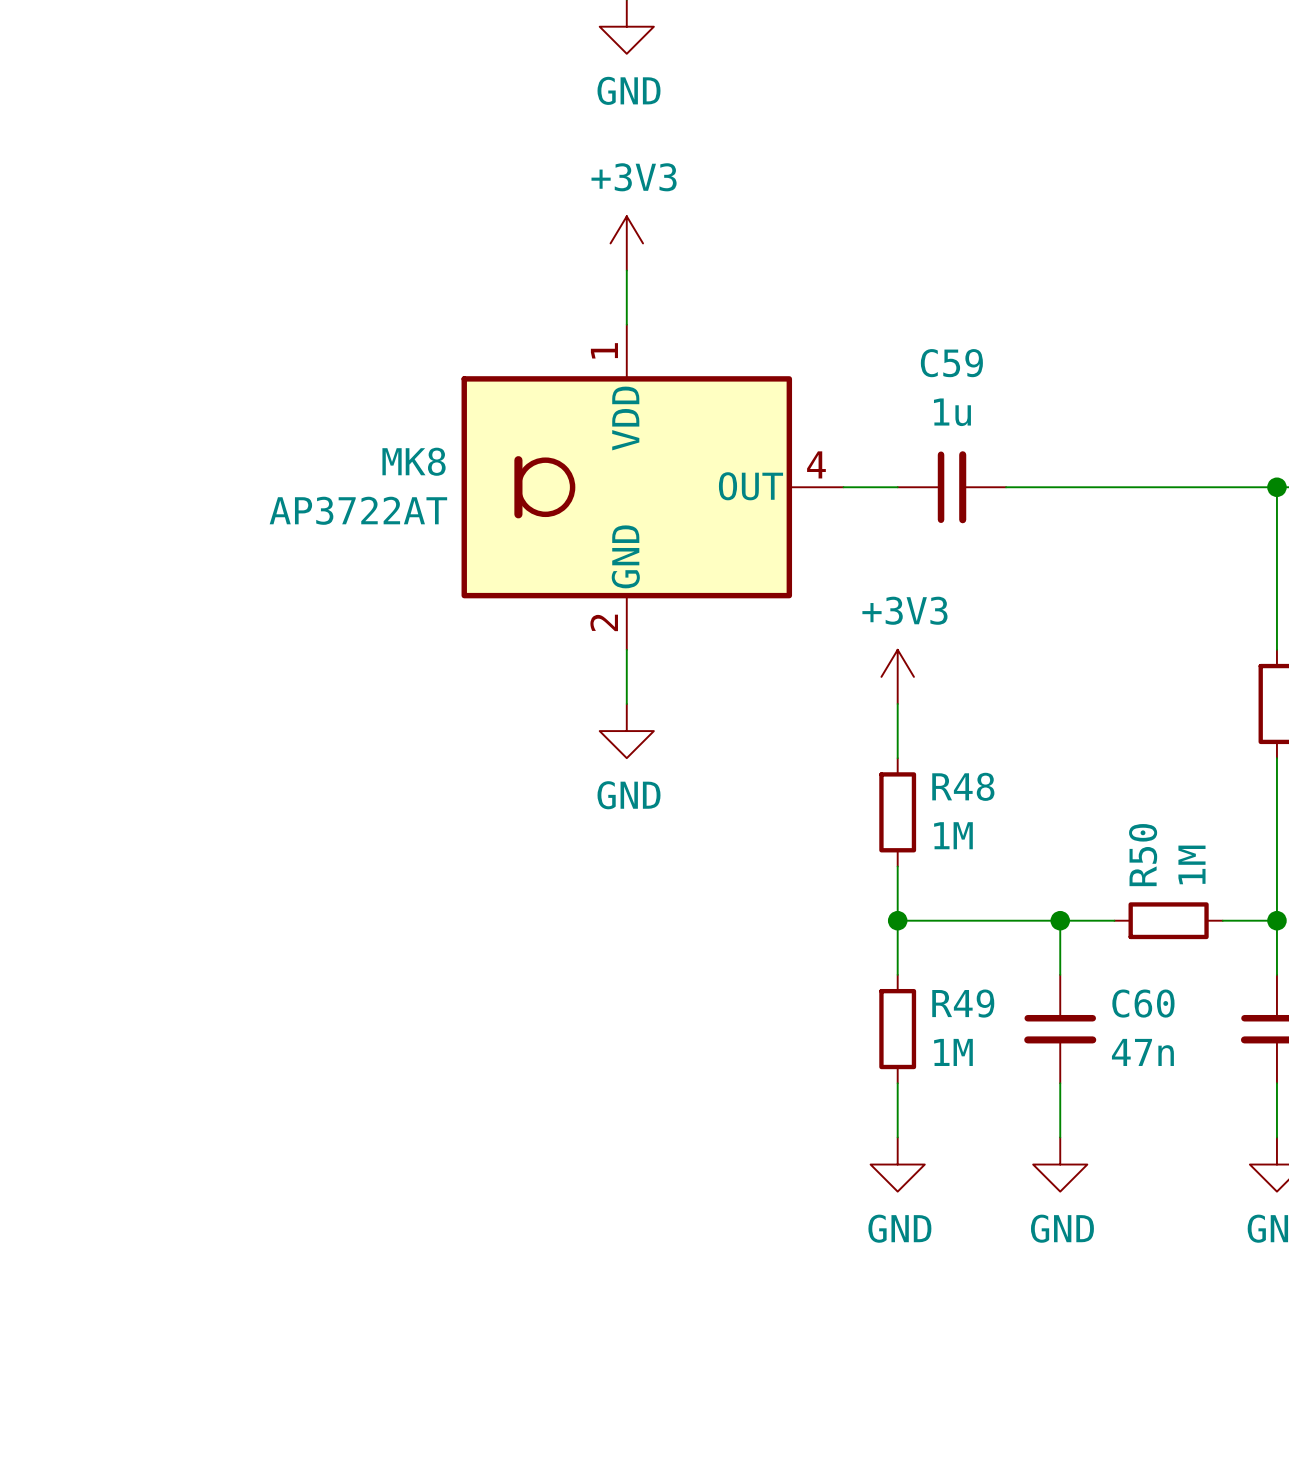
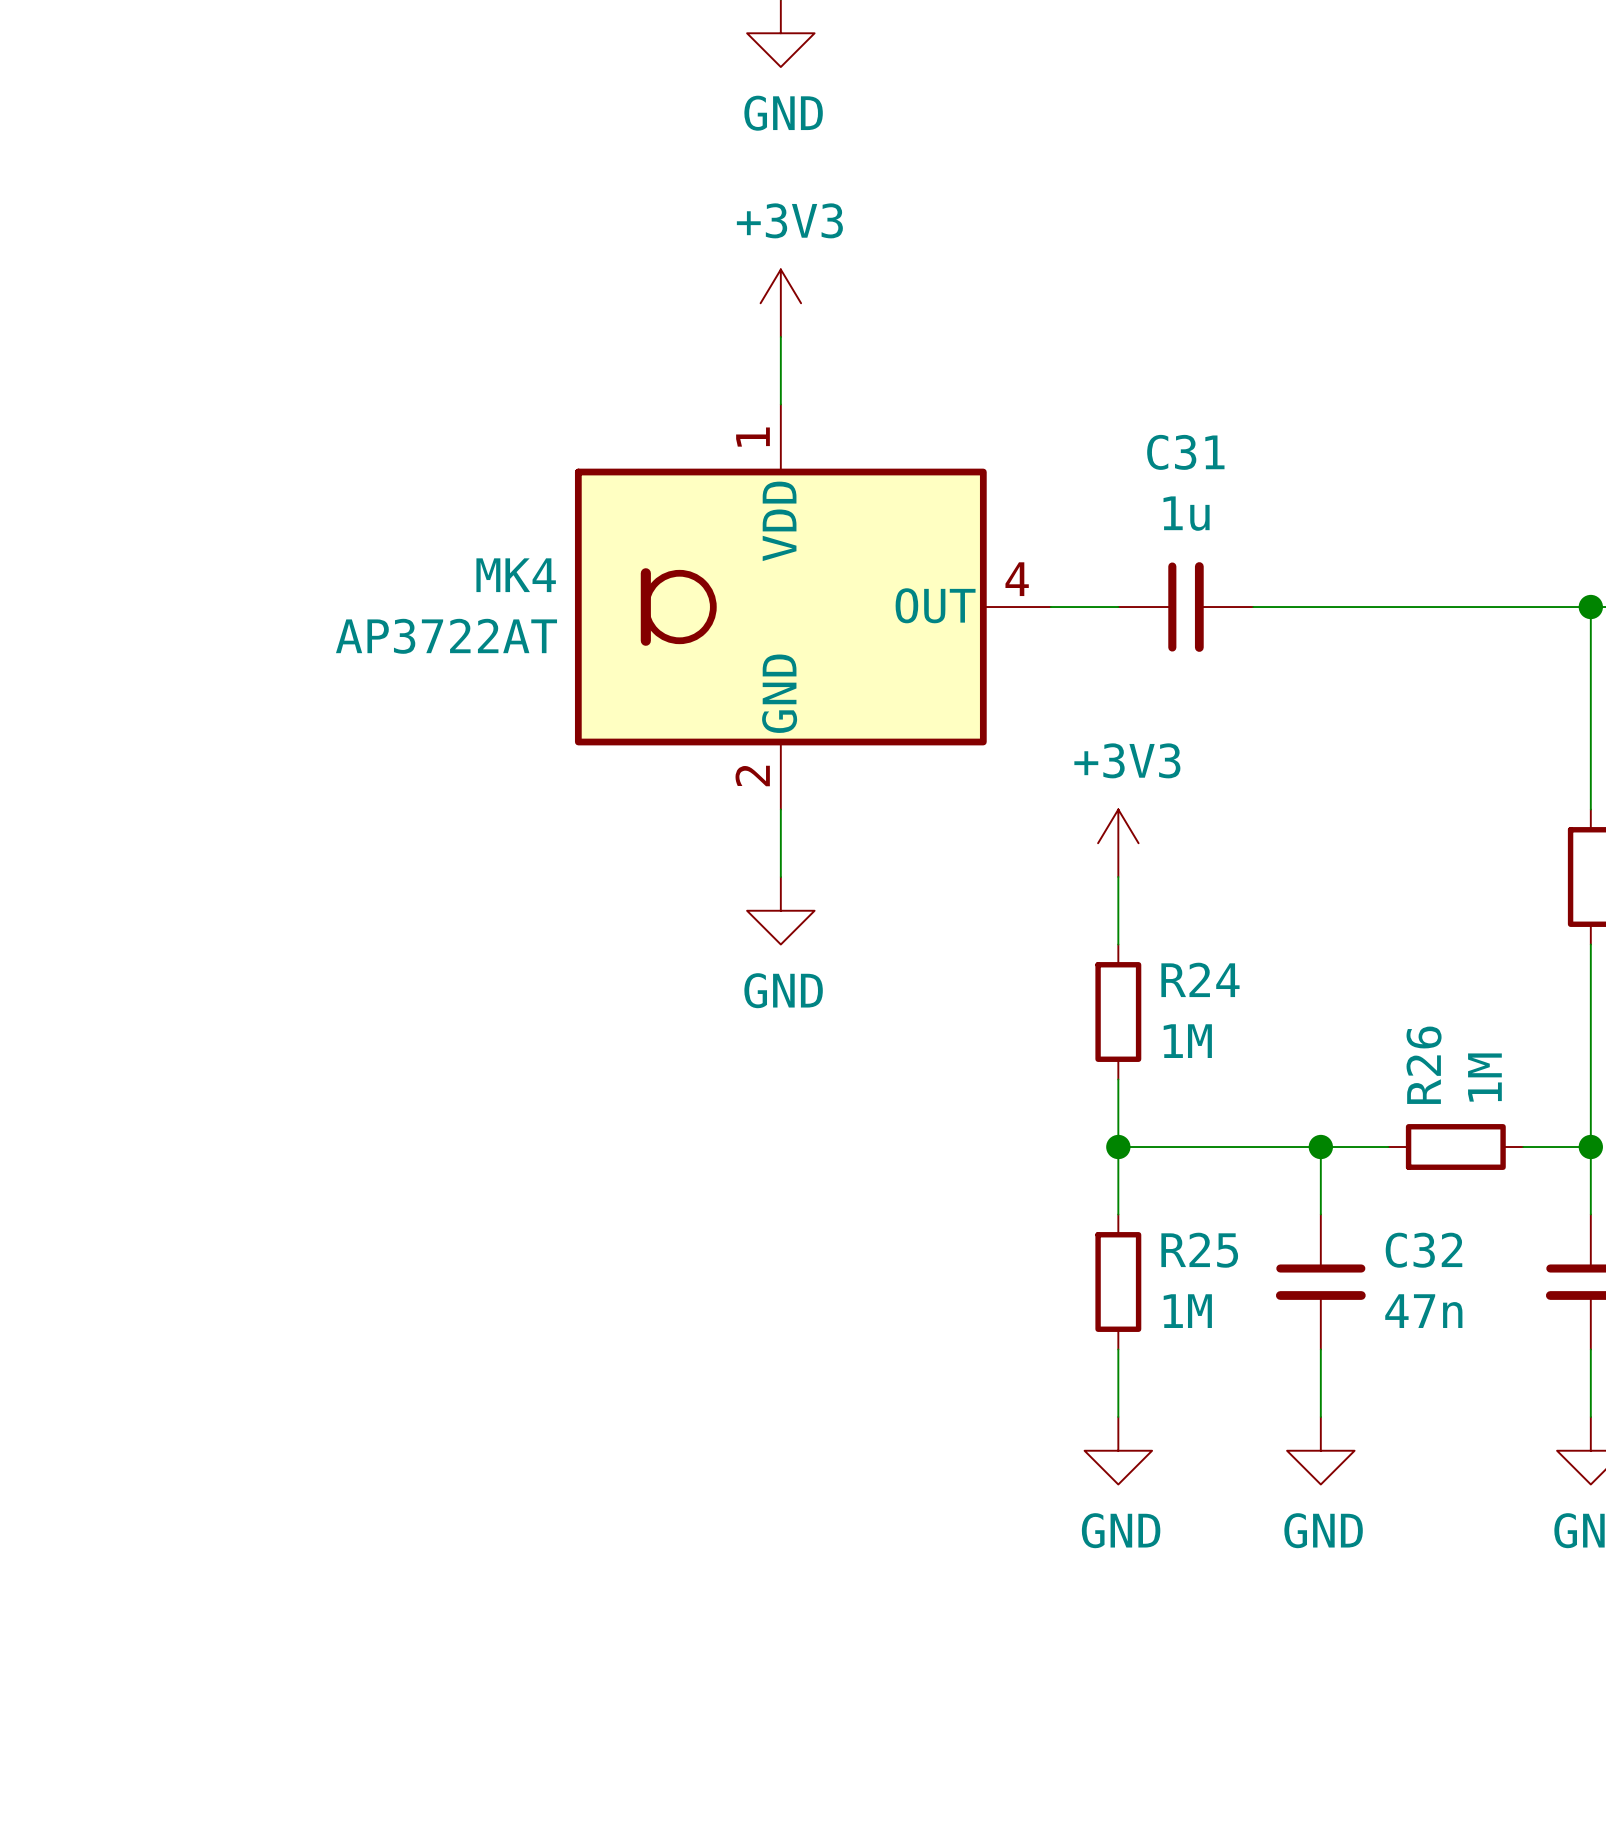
C59 name: C59 (951, 363) -> C31 (1185, 452)
MK8 name: MK8 (414, 461) -> MK4 (516, 575)
R48 name: R48 (963, 786) -> R24 (1200, 979)
R50 name: R50 (1143, 855) -> R26 (1424, 1065)
R49 name: R49 (963, 1003) -> R25 (1199, 1250)
C60 name: C60 (1143, 1003) -> C32 (1424, 1250)

